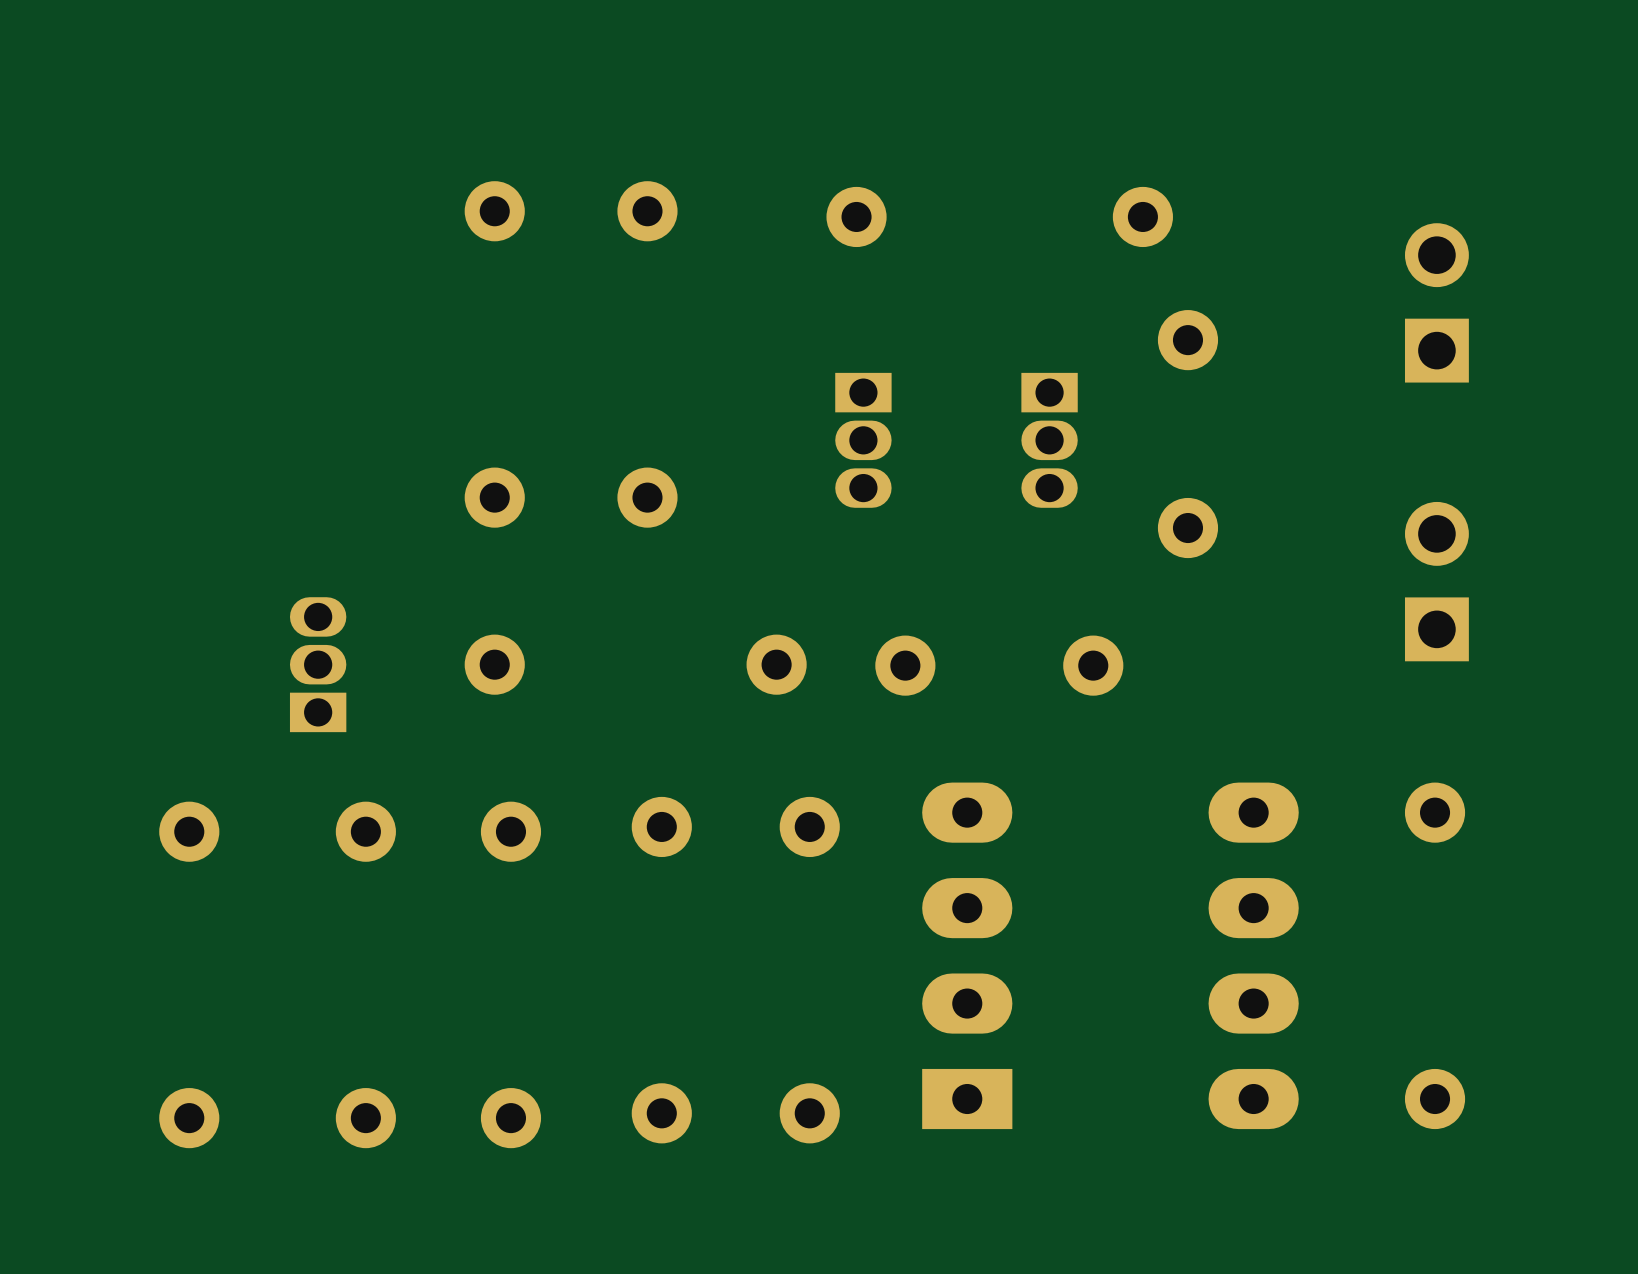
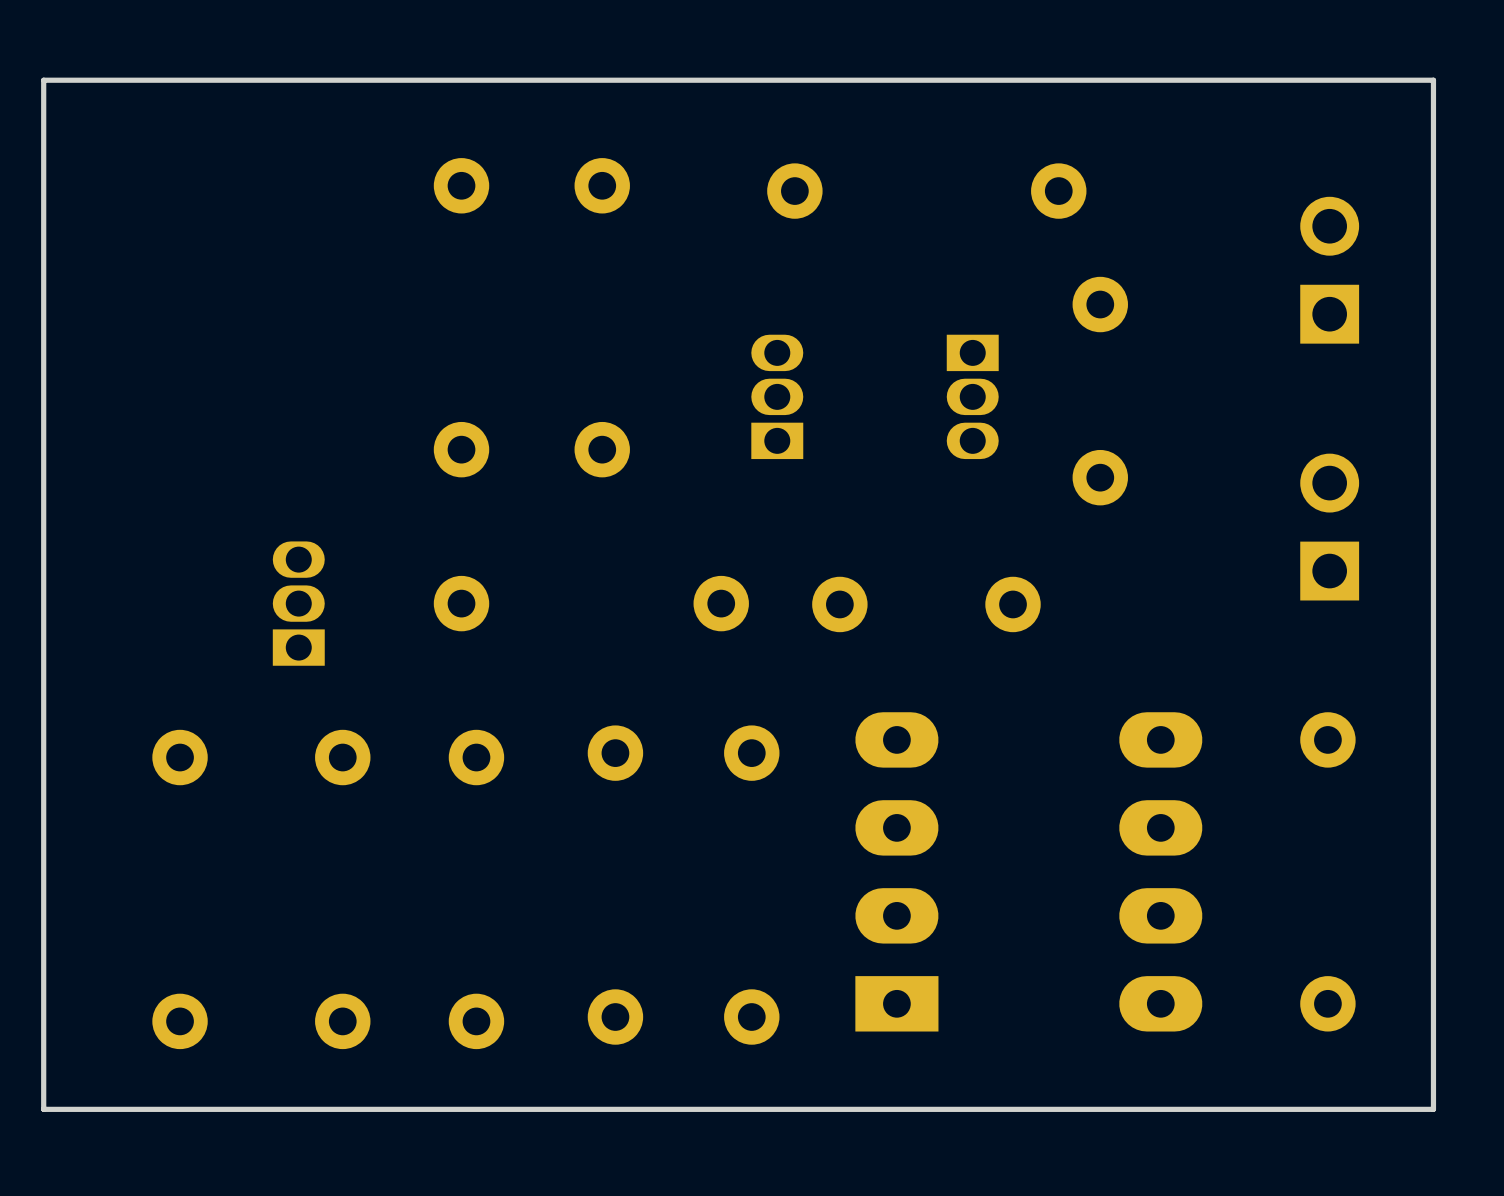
board edge: none -> (1433, 80) (1433, 1109) (43, 1109) (43, 80) (1433, 80)
part rotation: 0° (863, 440) -> 180° (777, 396)

